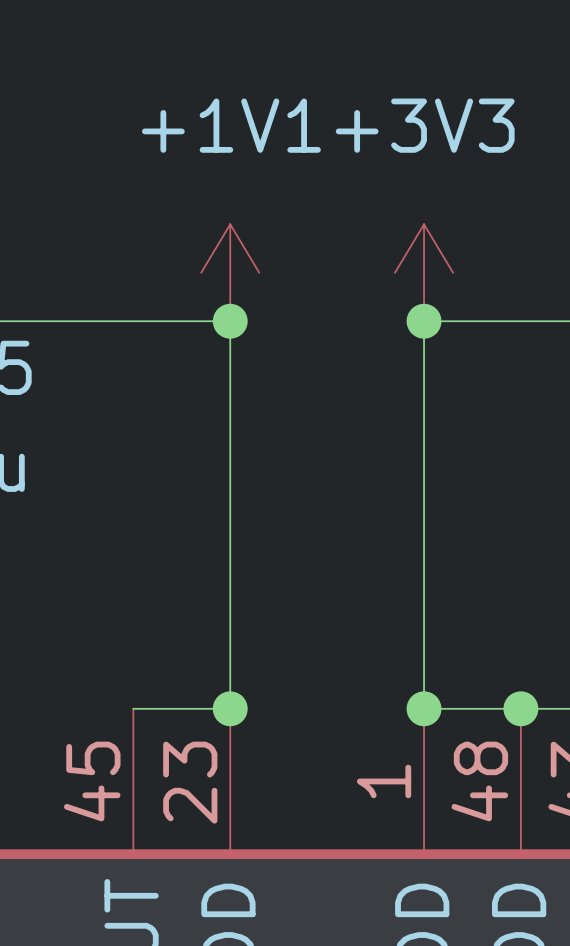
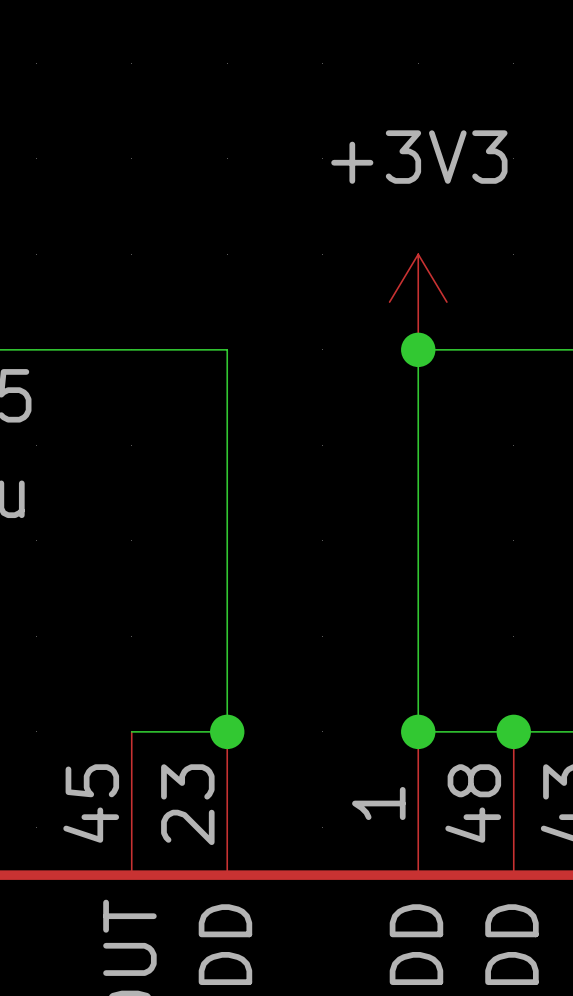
power symbol: +1V1 (230, 272) -> none
junction: (230, 321) -> none

